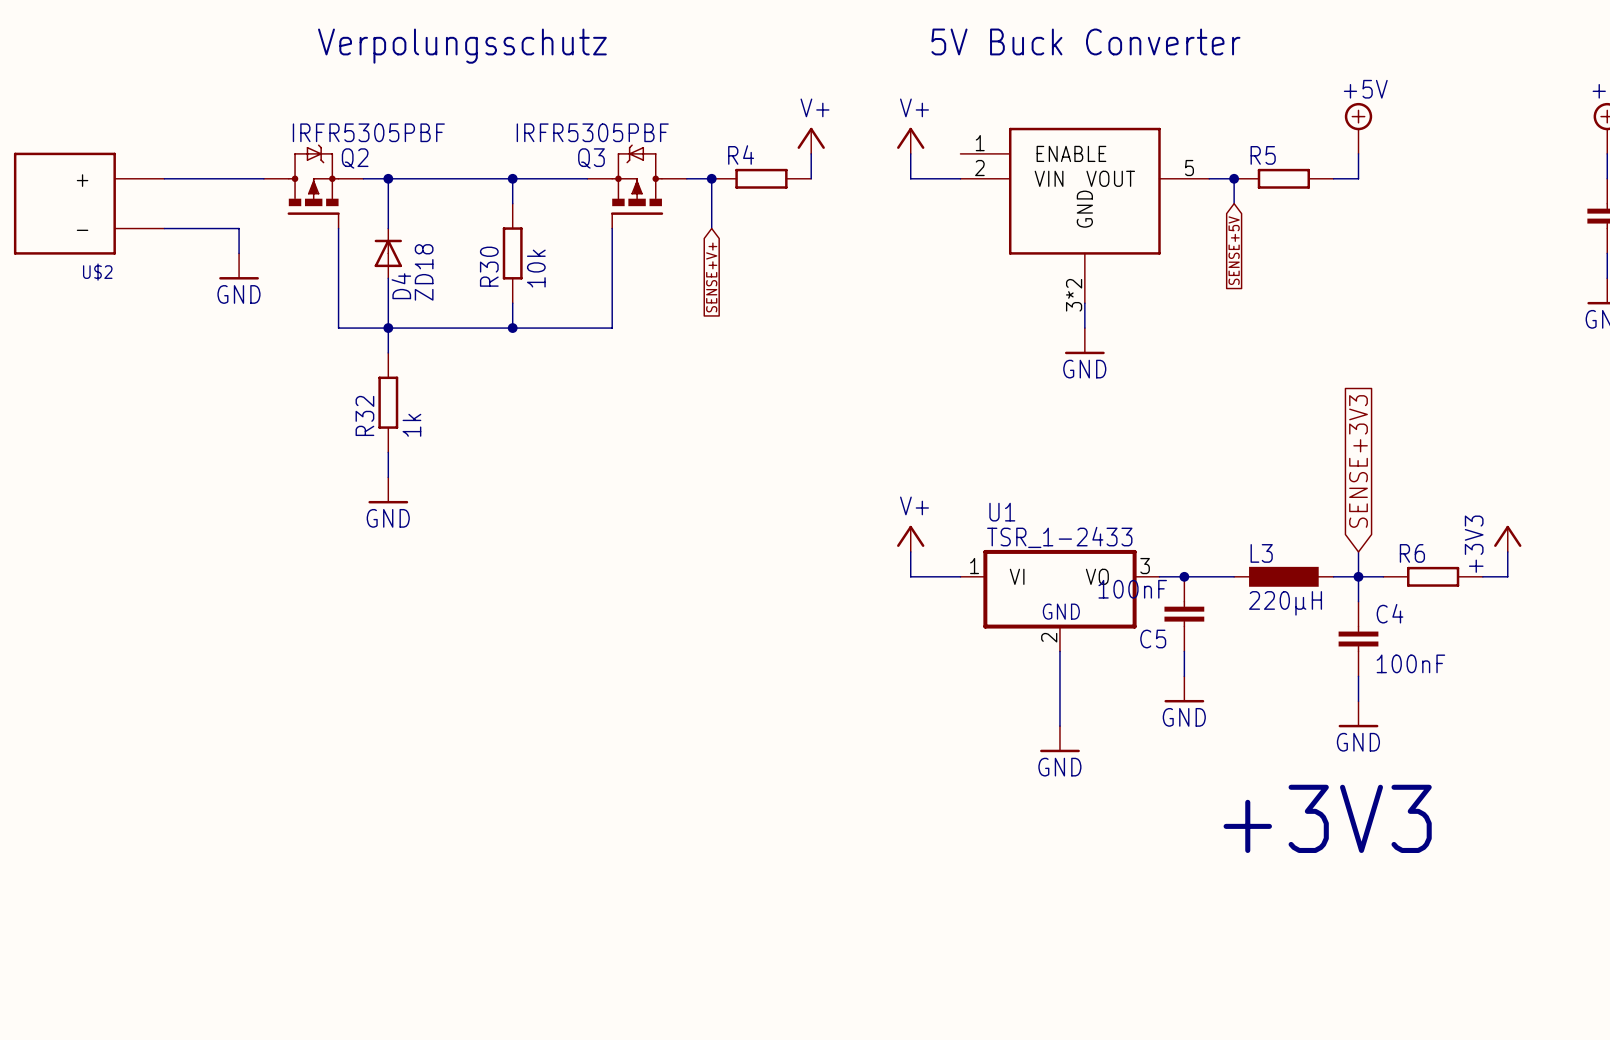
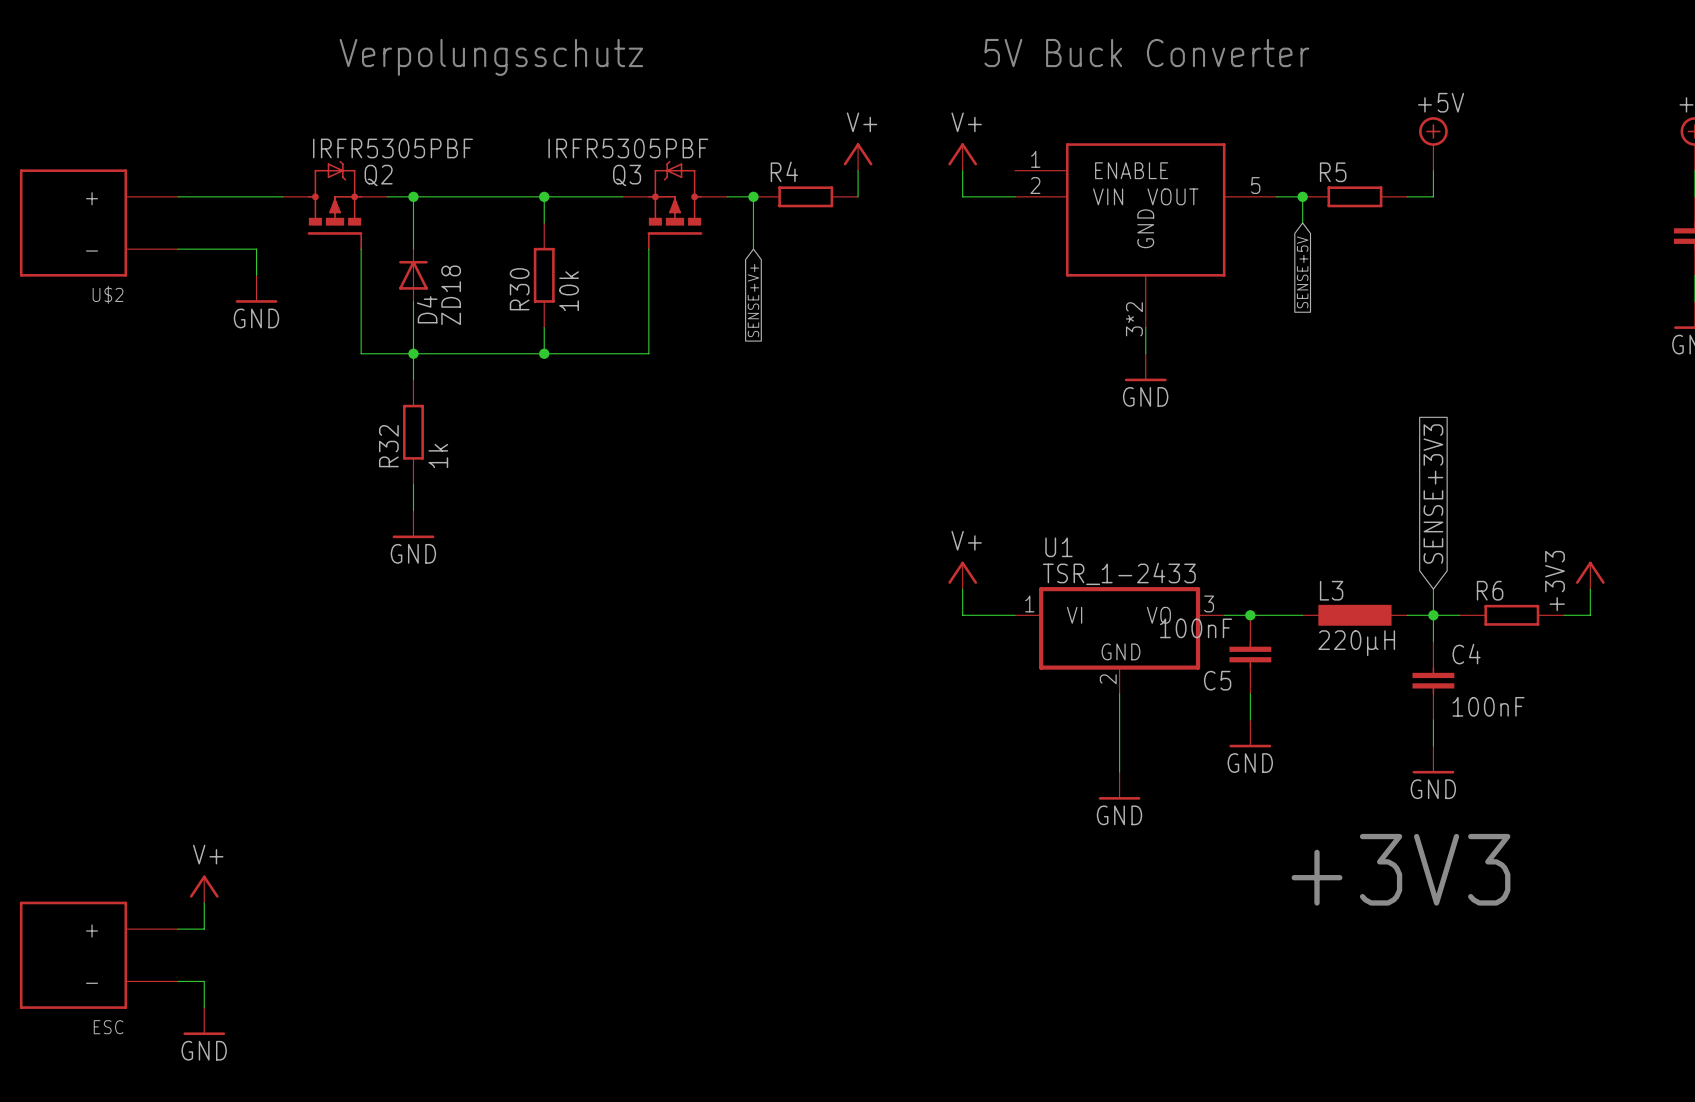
power symbol: none -> V+ (204, 889)
wire: none -> (204, 902) (204, 929) (178, 929)
ESC: none -> (98, 955)
wire: none -> (178, 981) (204, 981) (204, 1007)
power symbol: none -> GND (204, 1021)

